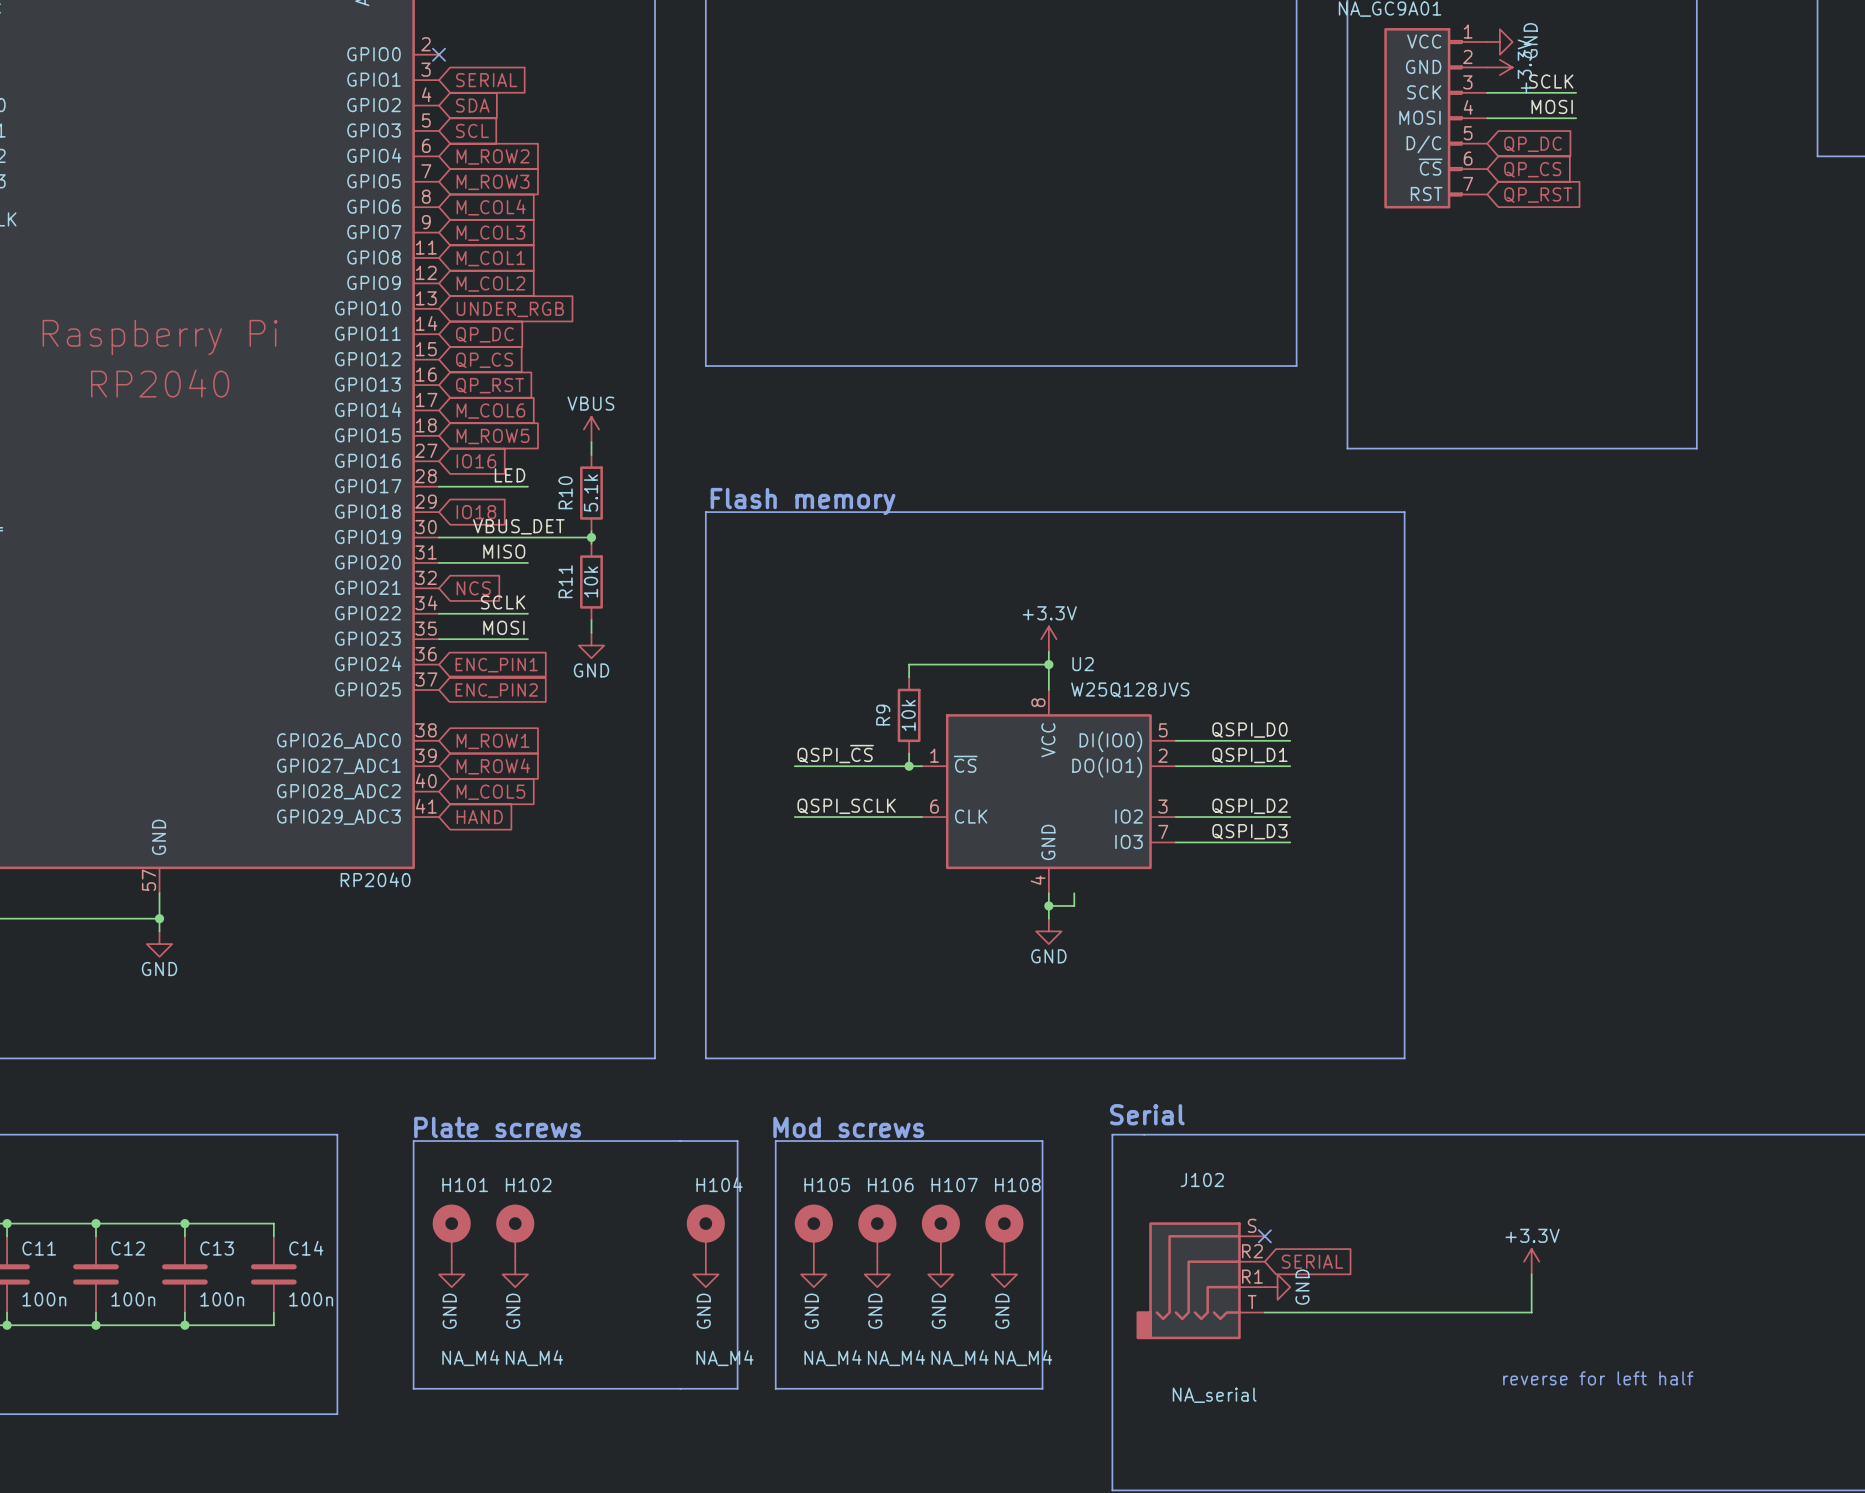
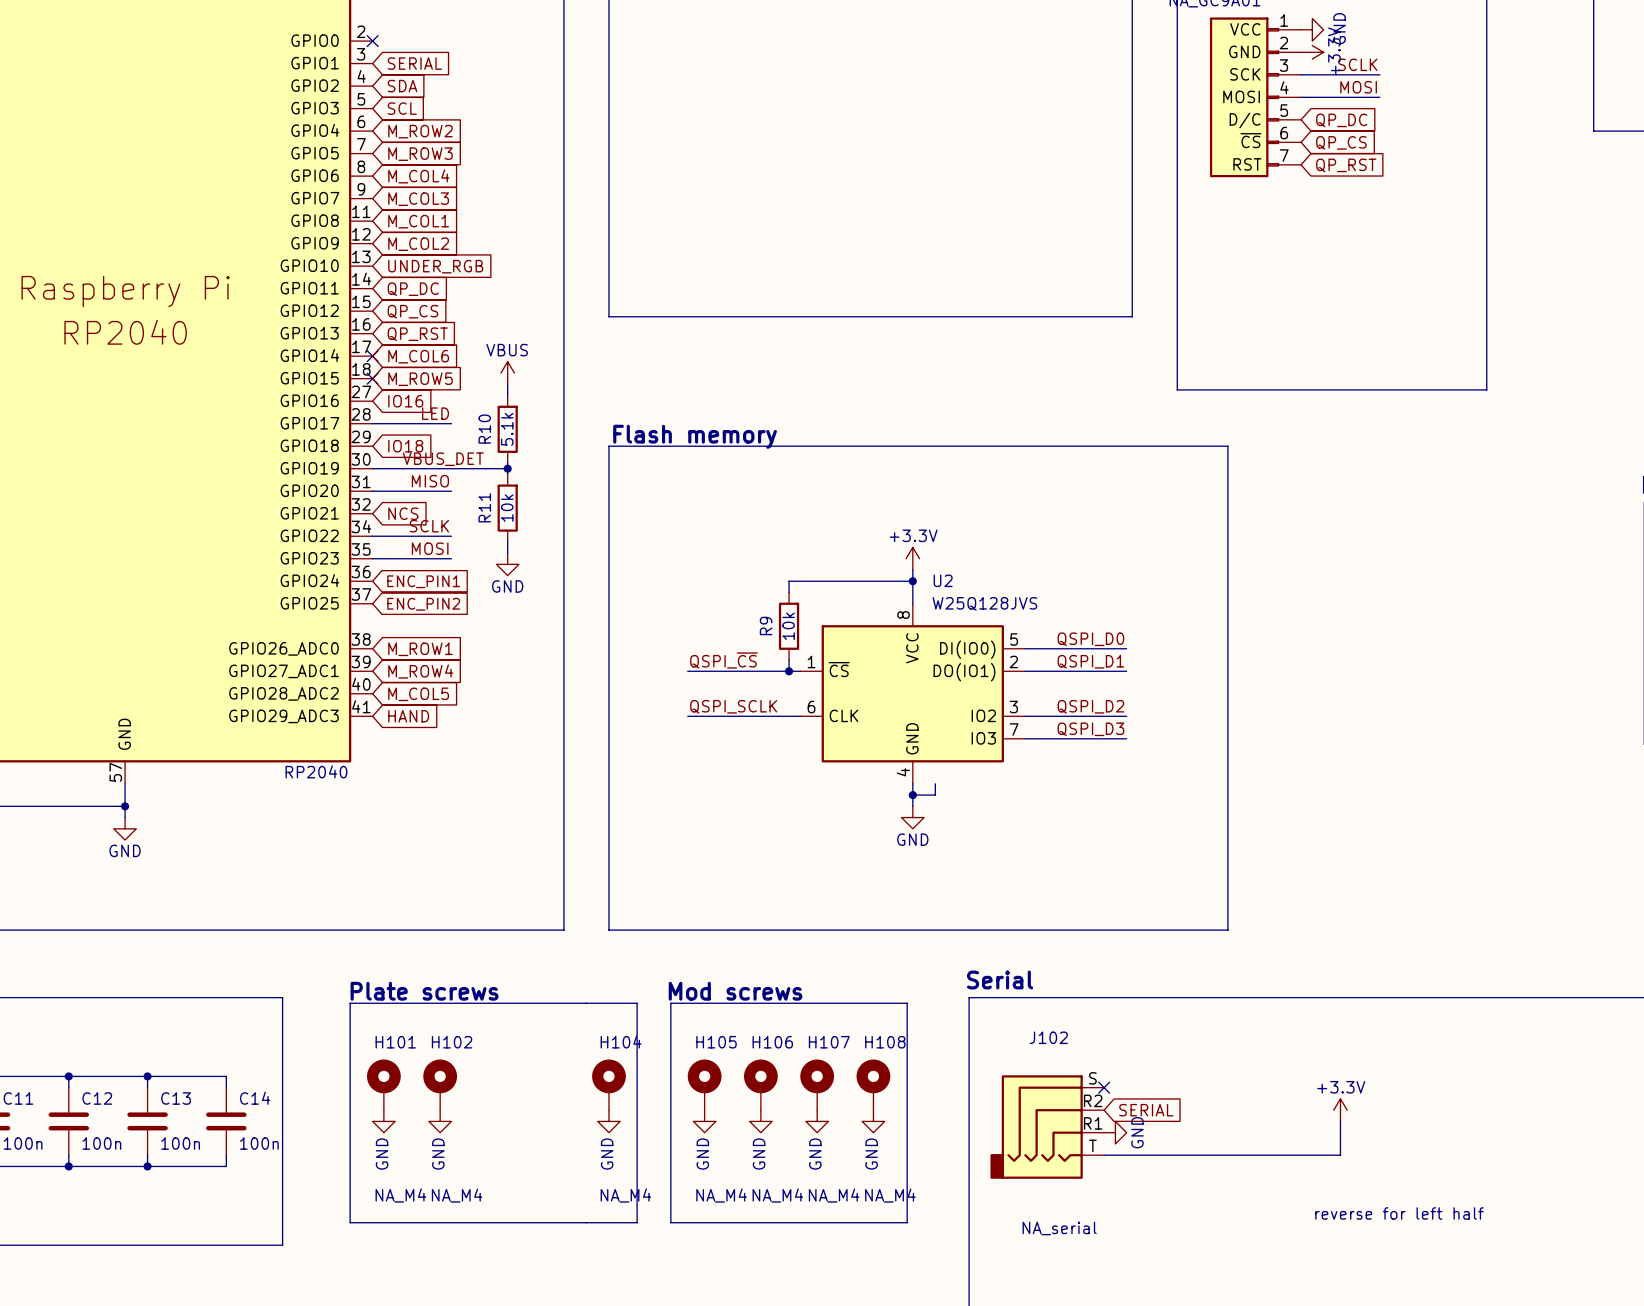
no-connect mark: none -> (372, 356)
no-connect mark: none -> (372, 378)

